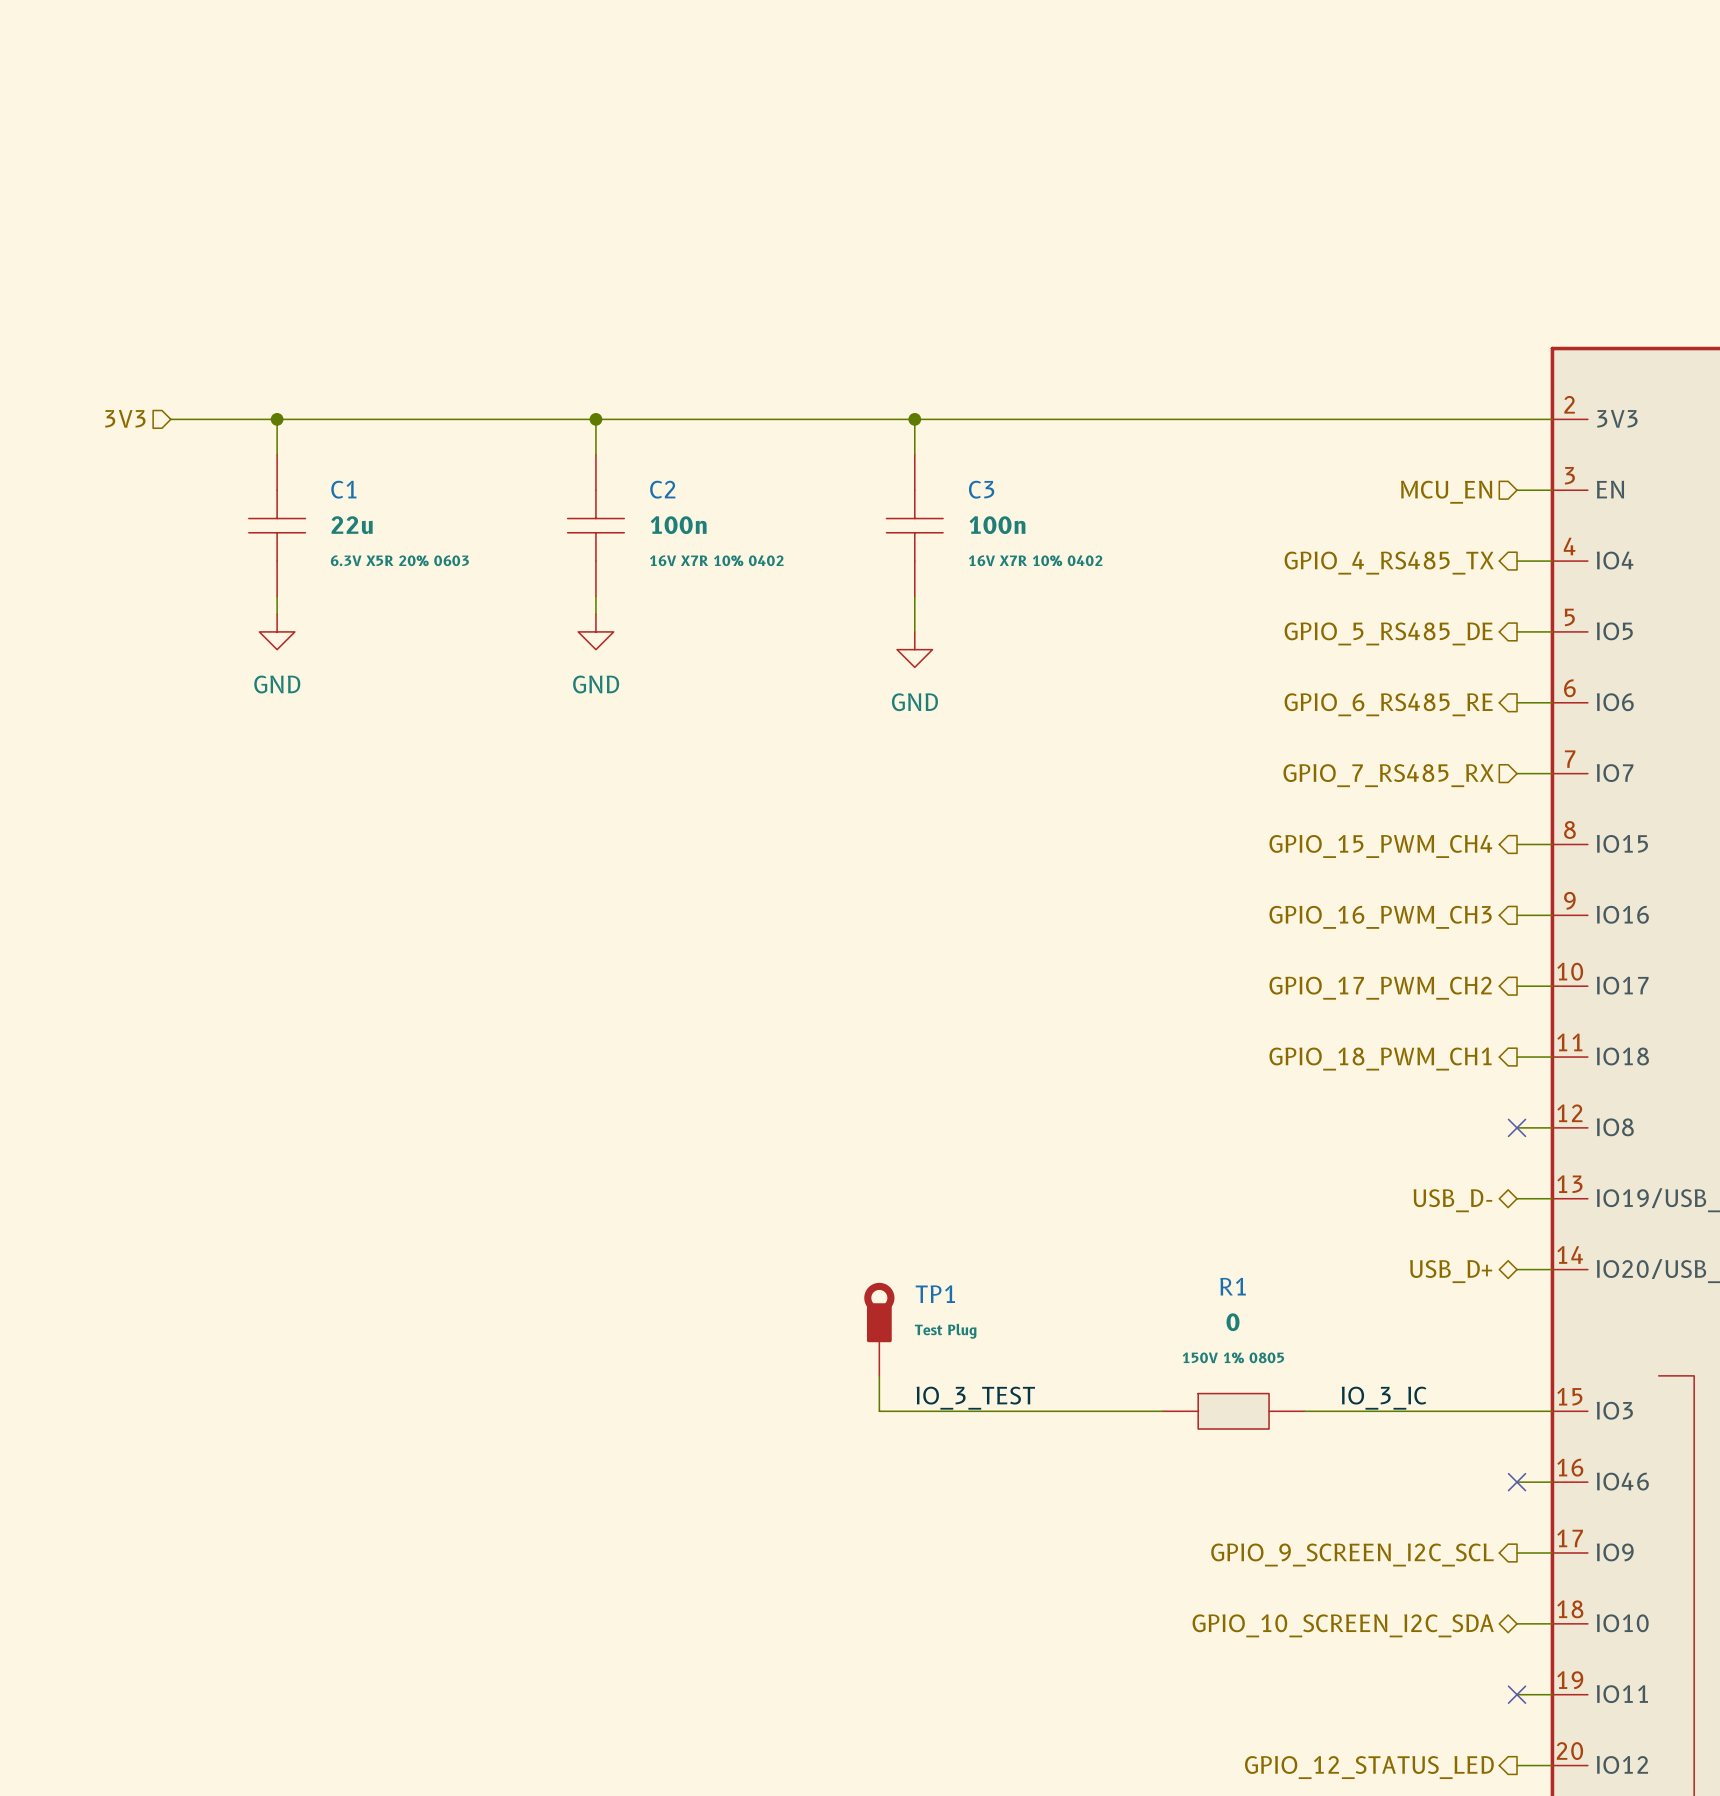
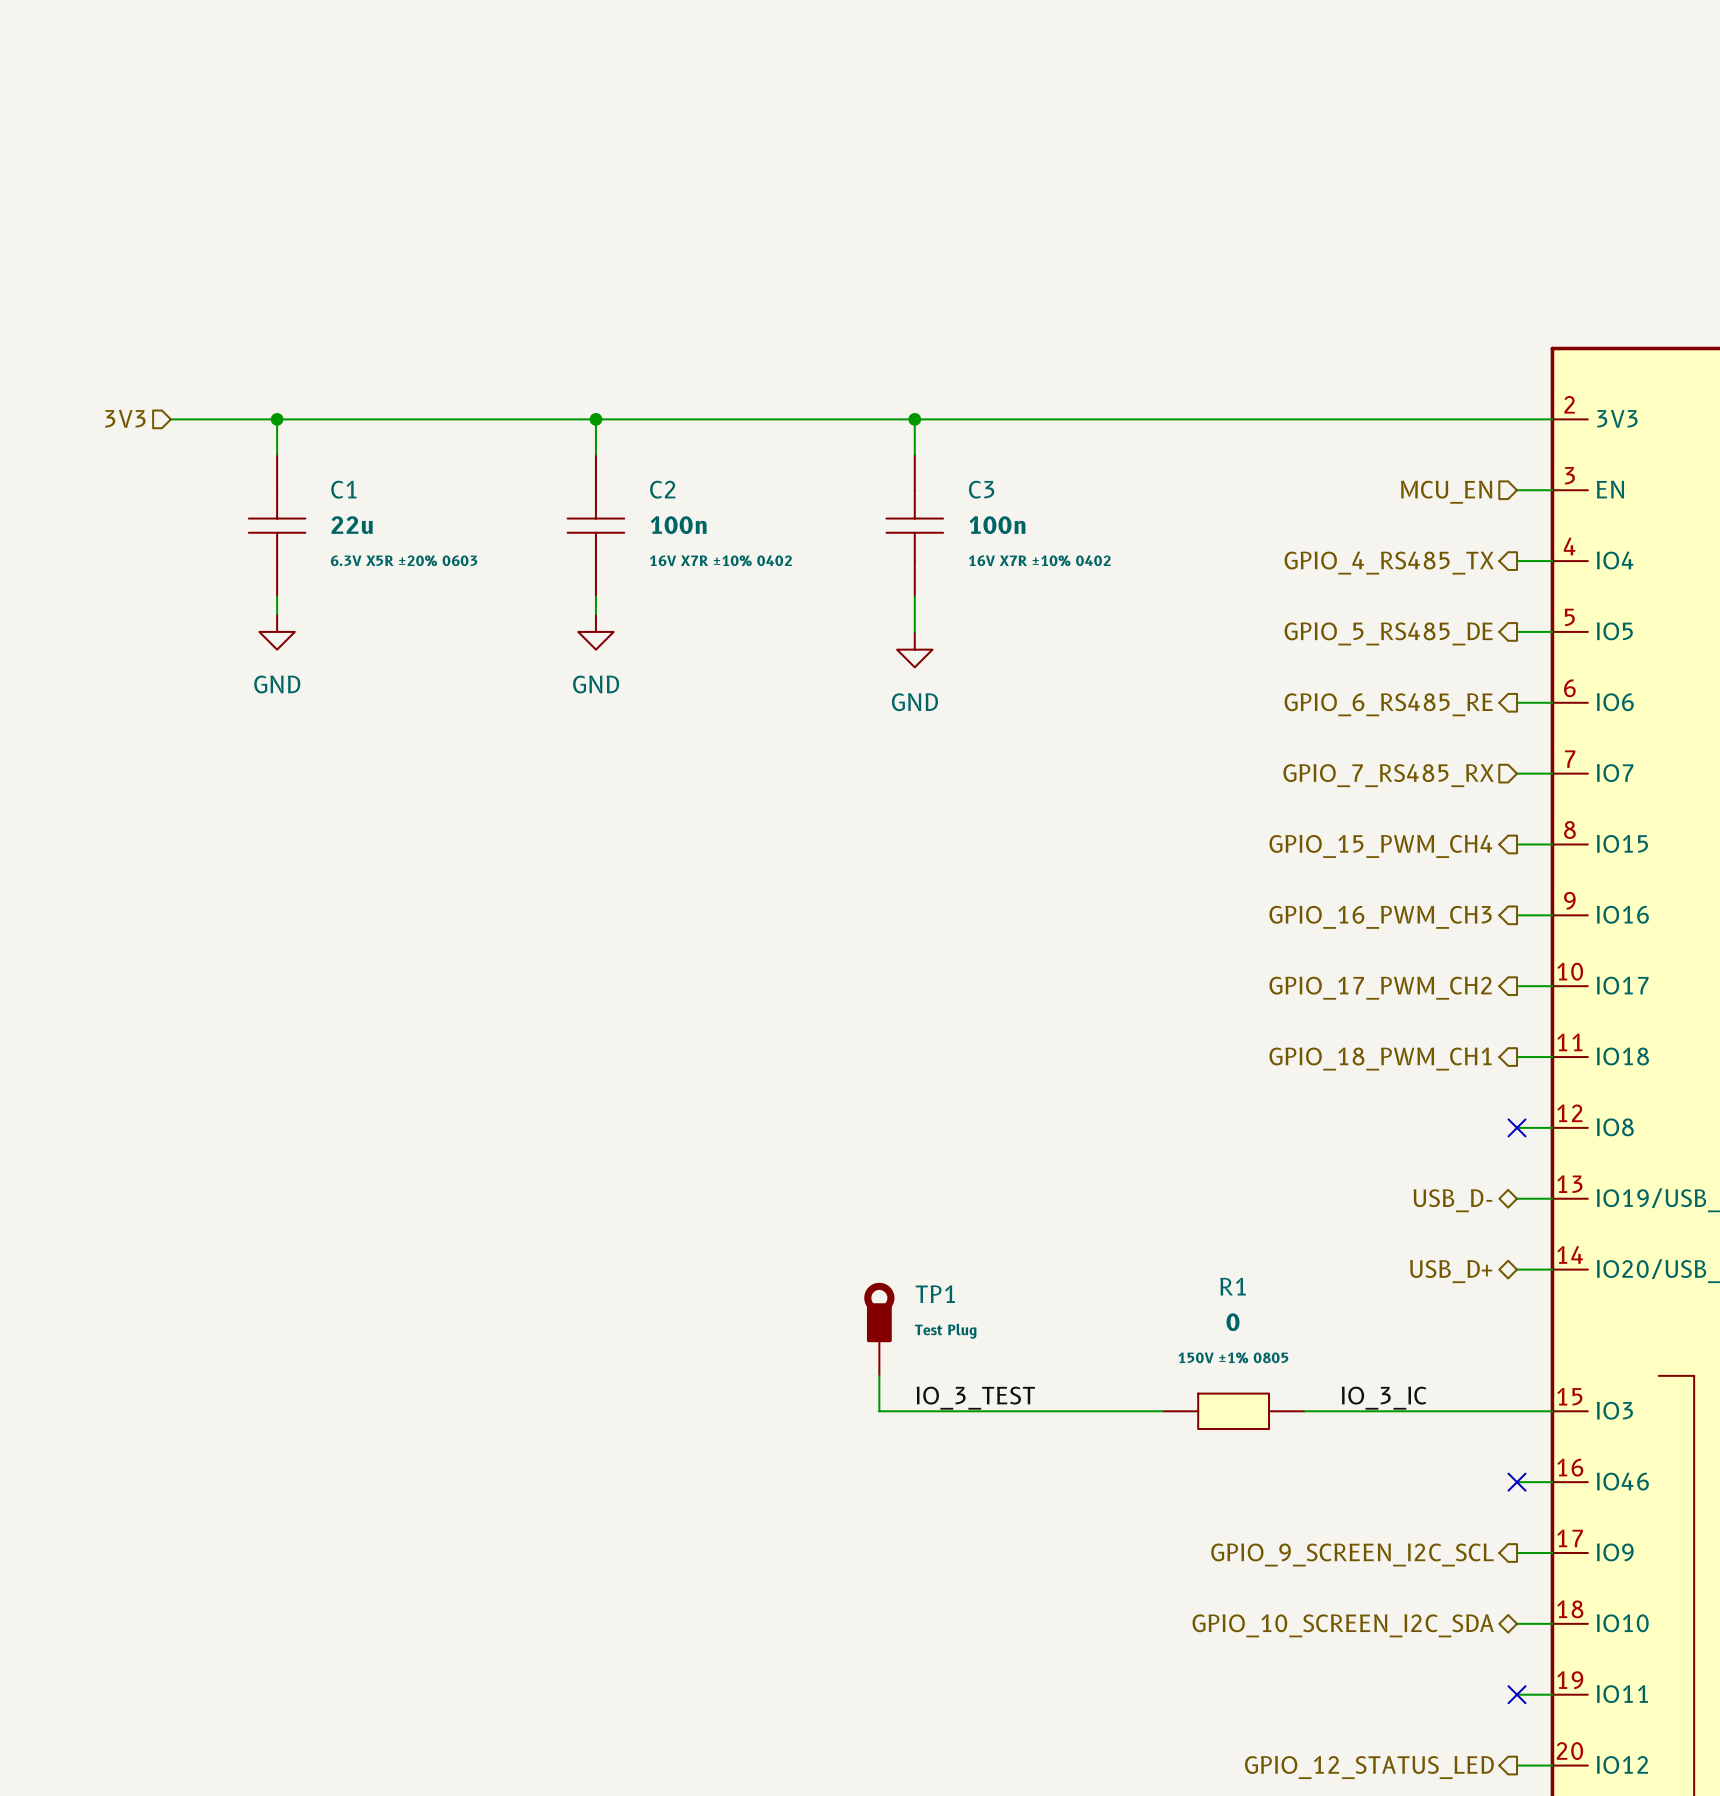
C1 text: 6.3V X5R 20% 0603 (399, 560) -> 6.3V X5R ±20% 0603 (404, 560)
C2 text: 16V X7R 10% 0402 (716, 560) -> 16V X7R ±10% 0402 (720, 560)
C3 text: 16V X7R 10% 0402 (1035, 560) -> 16V X7R ±10% 0402 (1039, 560)
R1 text: 150V 1% 0805 (1233, 1357) -> 150V ±1% 0805 (1233, 1357)

